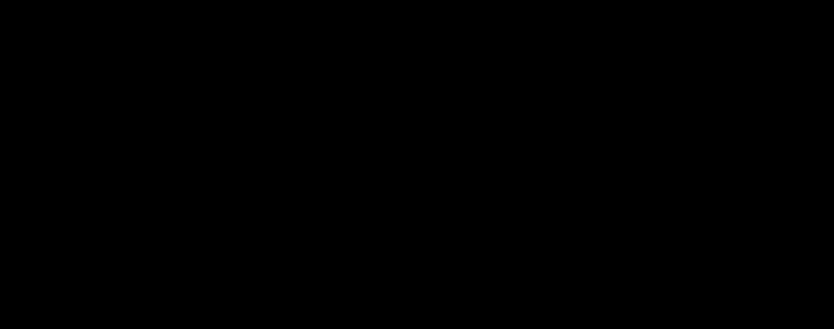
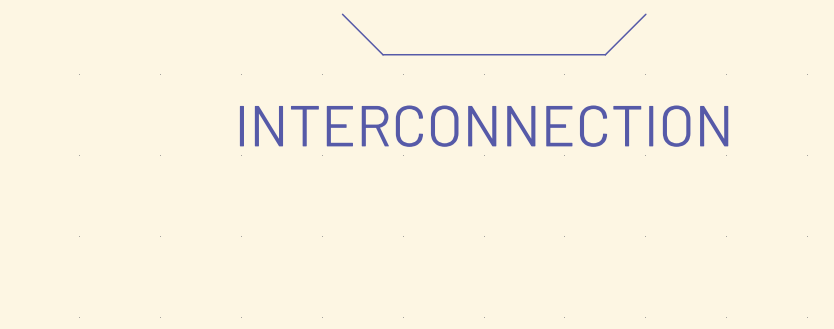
line: none -> (342, 14) (382, 54) (605, 54) (645, 14)
text: none -> INTERCONNECTION (484, 126)

